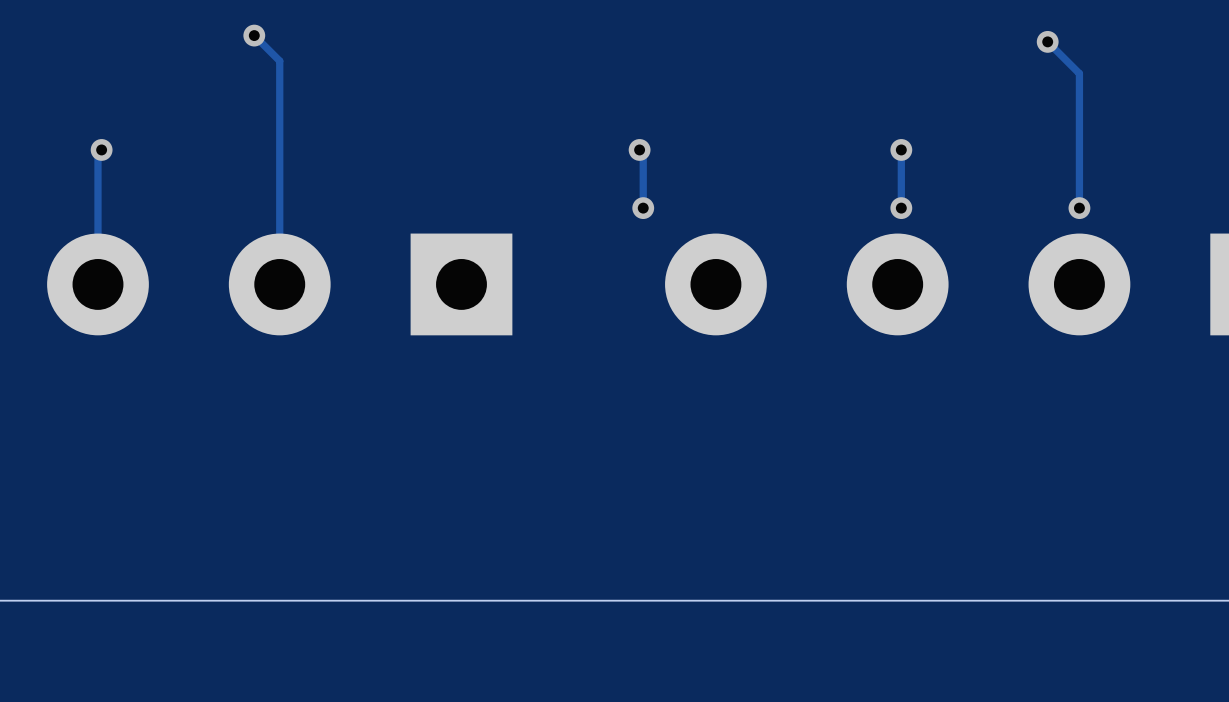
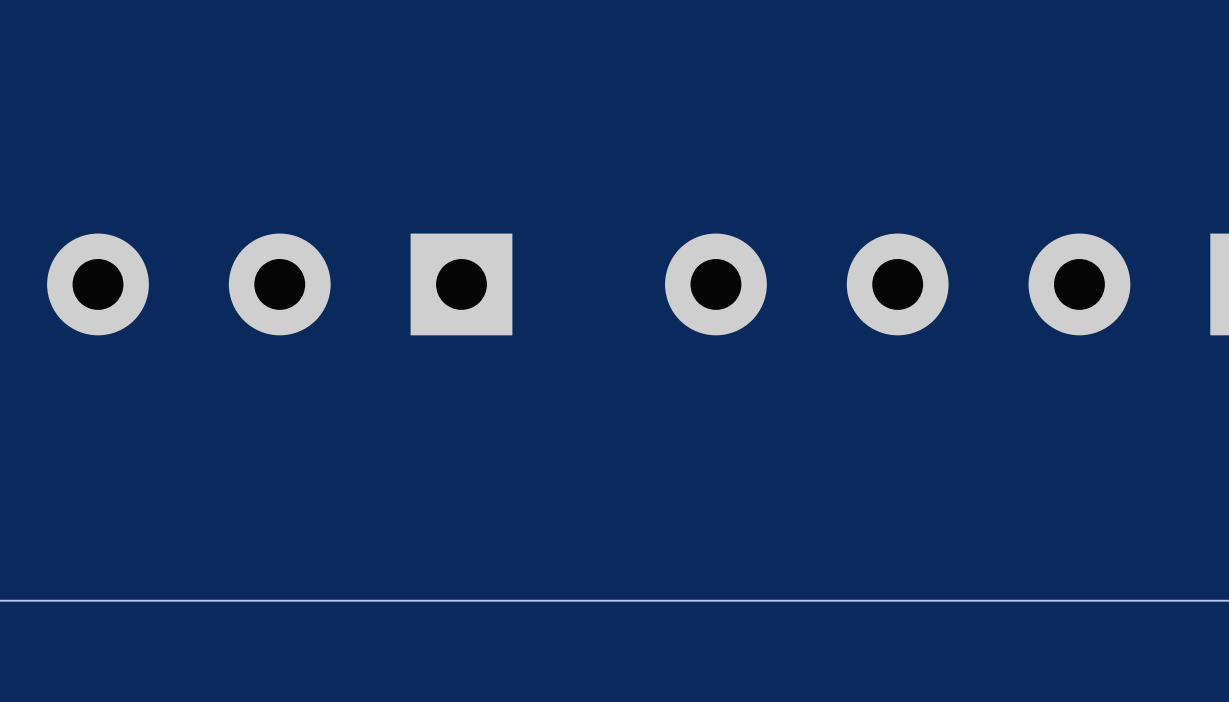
track: (254, 35) (279, 61) (279, 284) -> none
via: (254, 35) -> none
track: (1047, 41) (1079, 73) (1079, 208) -> none
via: (1047, 41) -> none
track: (101, 149) (97, 153) (97, 284) -> none
via: (101, 149) -> none
track: (639, 149) (643, 153) (643, 208) -> none
via: (639, 149) -> none
track: (901, 149) (901, 208) -> none
via: (901, 149) -> none
via: (643, 208) -> none
via: (901, 208) -> none
via: (1079, 208) -> none

